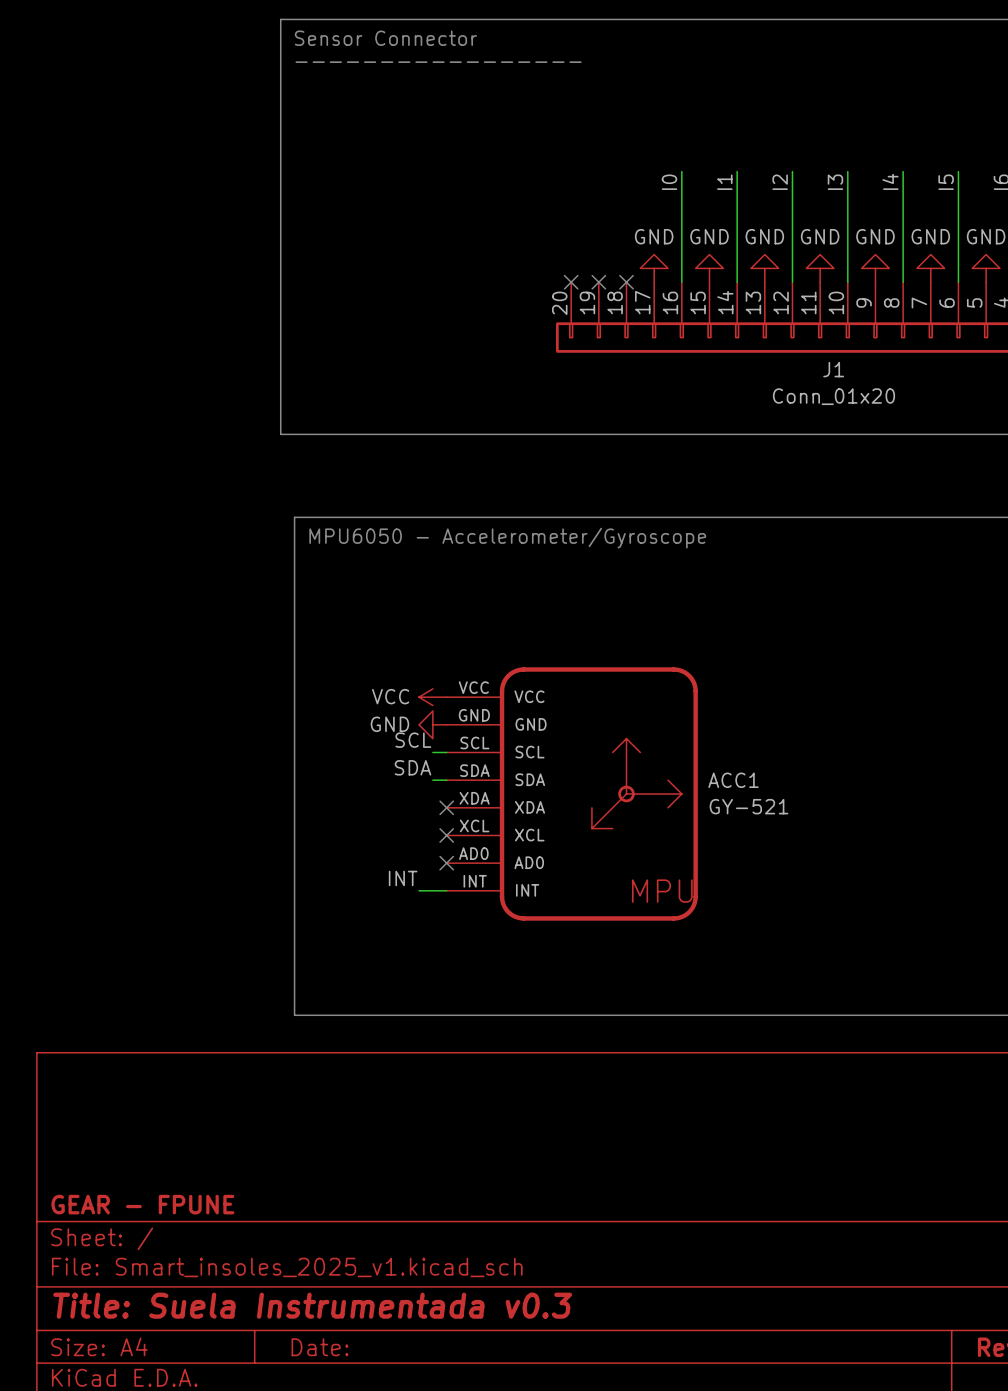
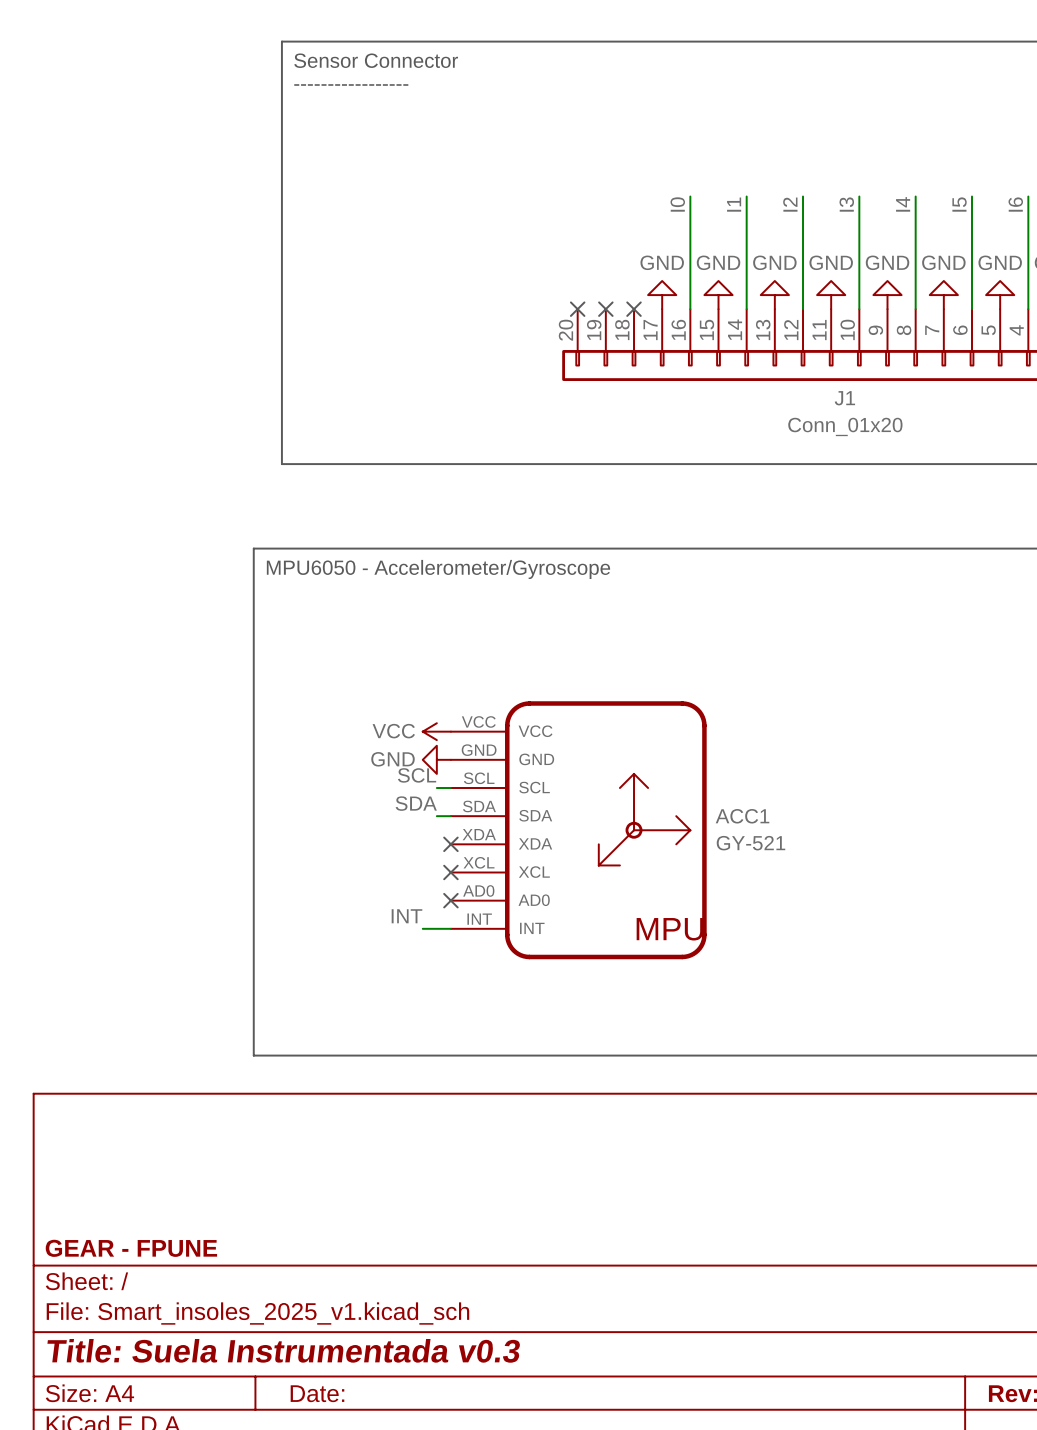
line: (294, 517) (294, 1015) -> (296, 548) (253, 548) (253, 1055) (296, 1055)
text position: MPU6050 - Accelerometer/Gyroscope (507, 538) -> MPU6050 - Accelerometer/Gyroscope (438, 569)

